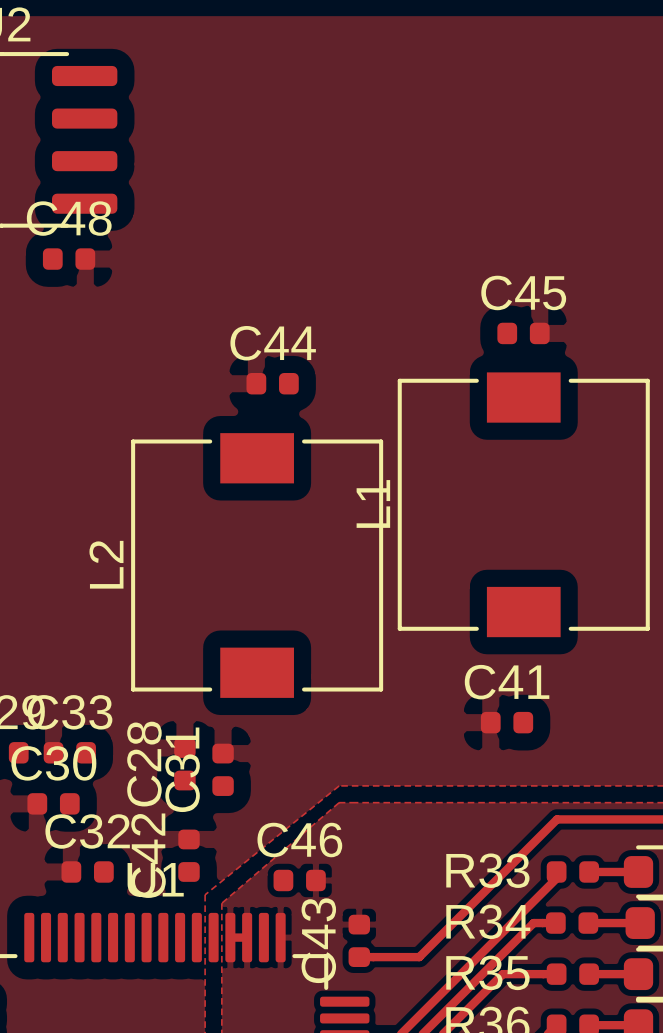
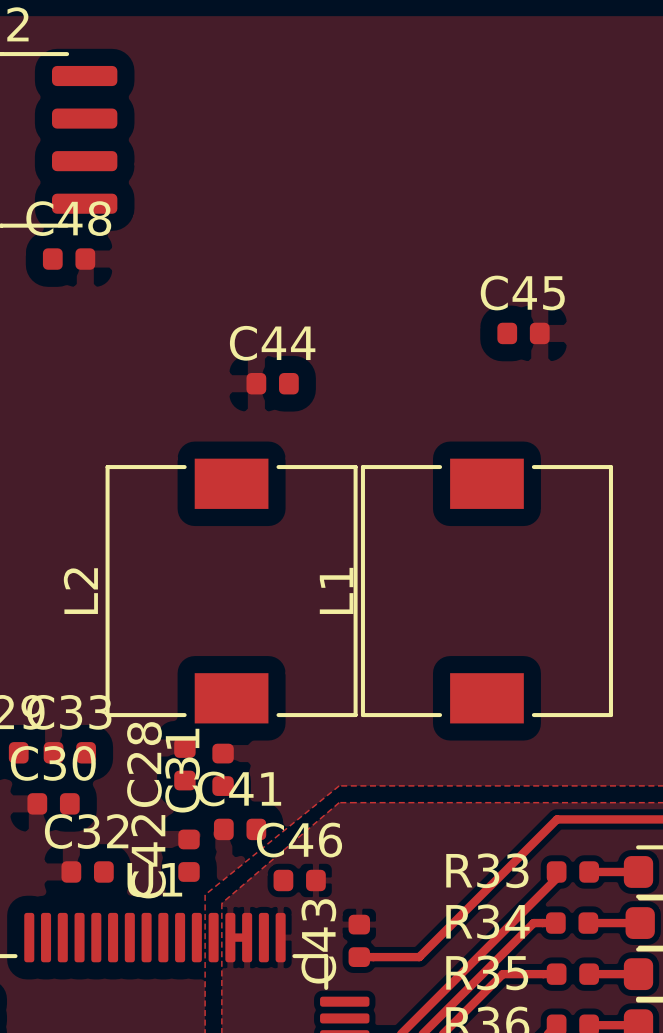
L1 position: (523, 504) -> (486, 591)
L2 position: (257, 565) -> (231, 591)
C41 position: (507, 722) -> (240, 829)

